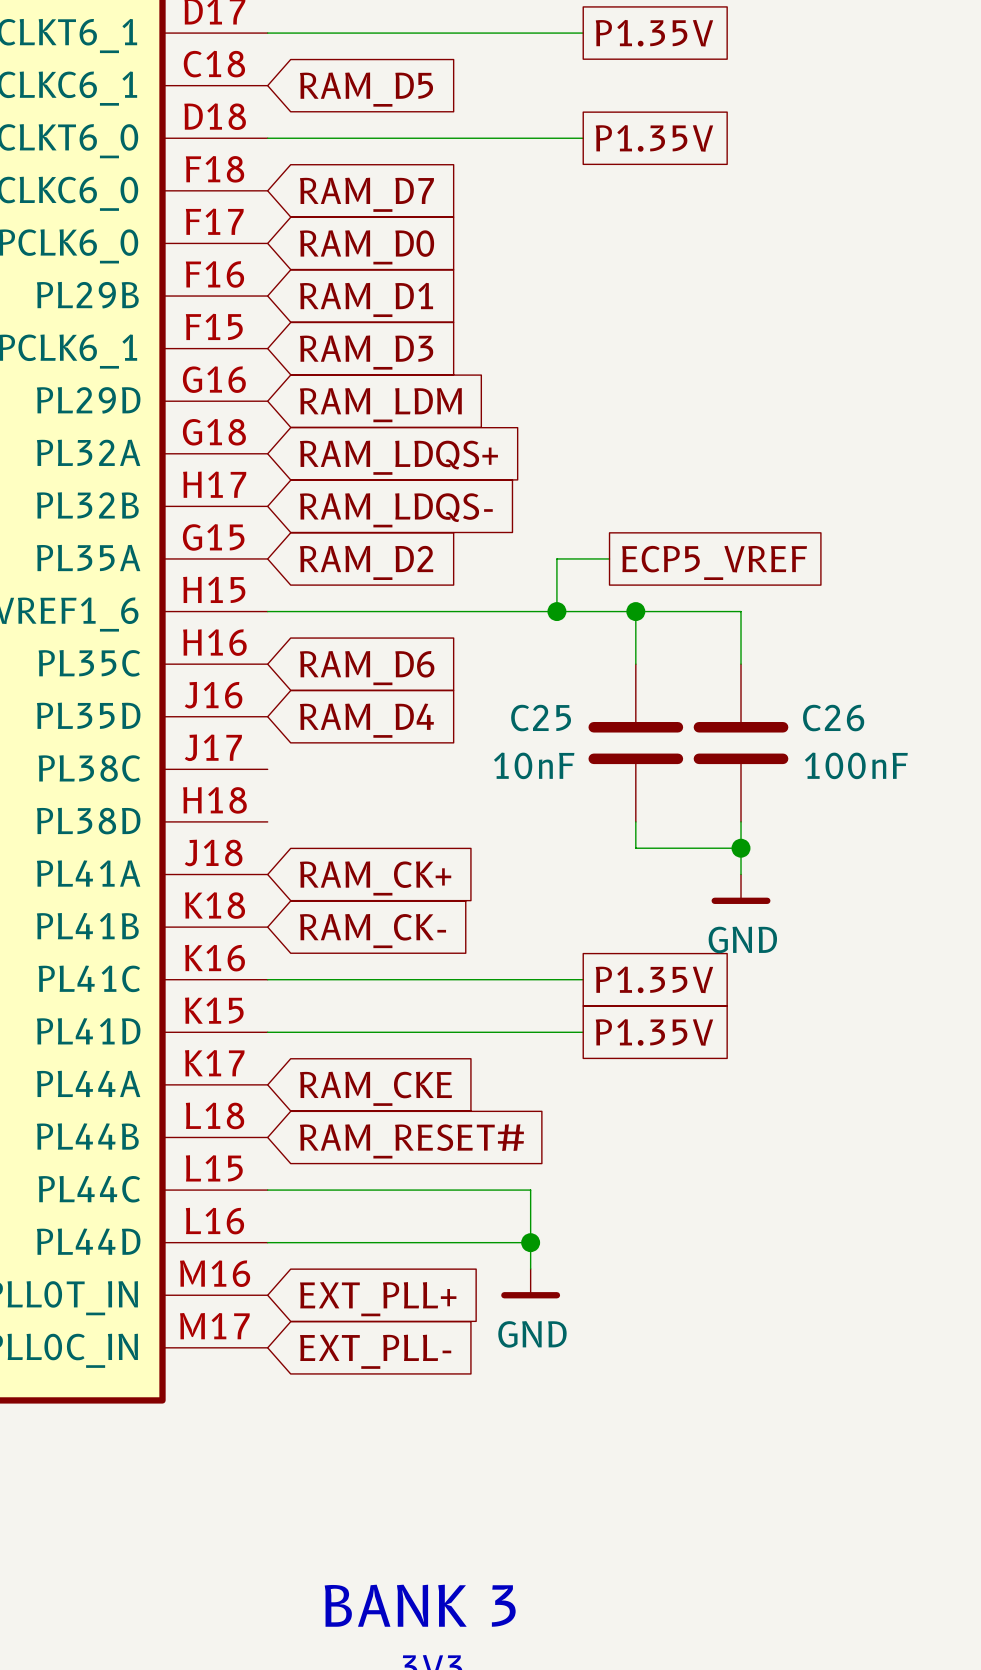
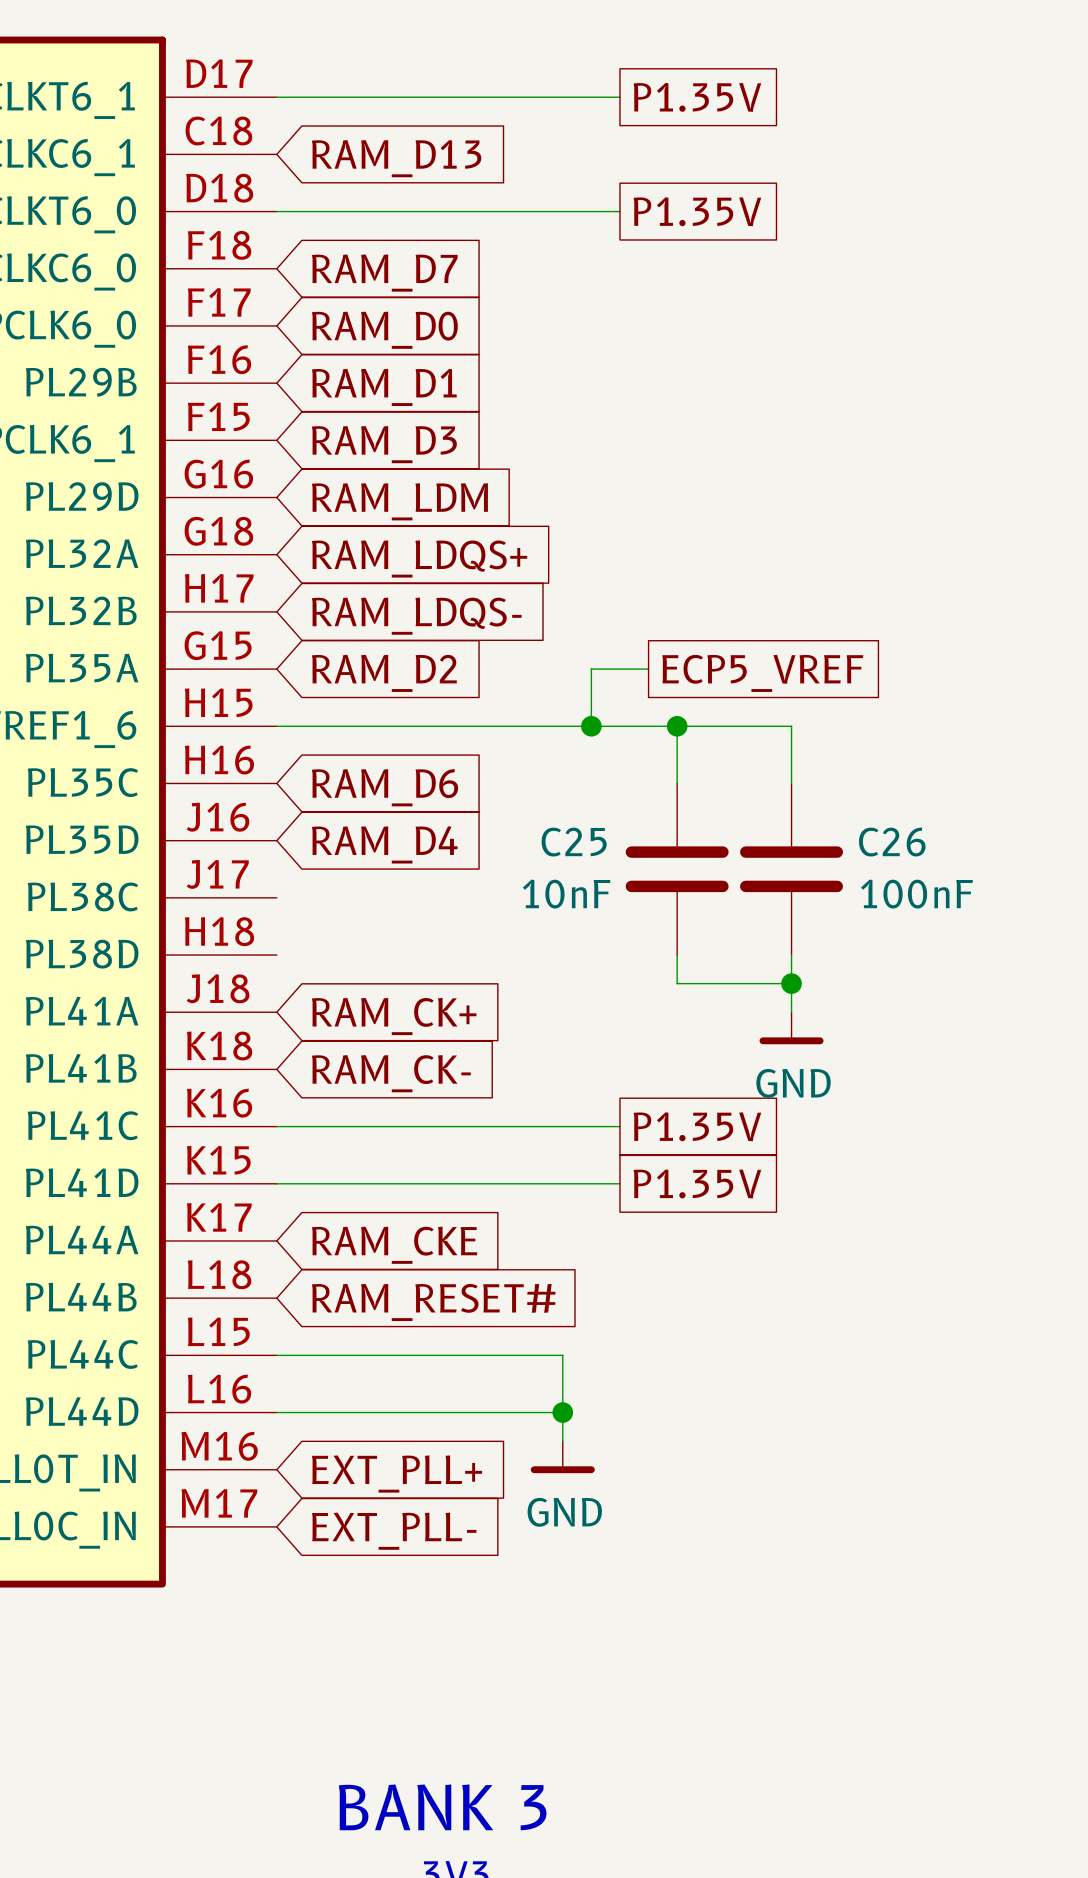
global label: RAM_D5 (366, 89) -> RAM_D13 (396, 158)

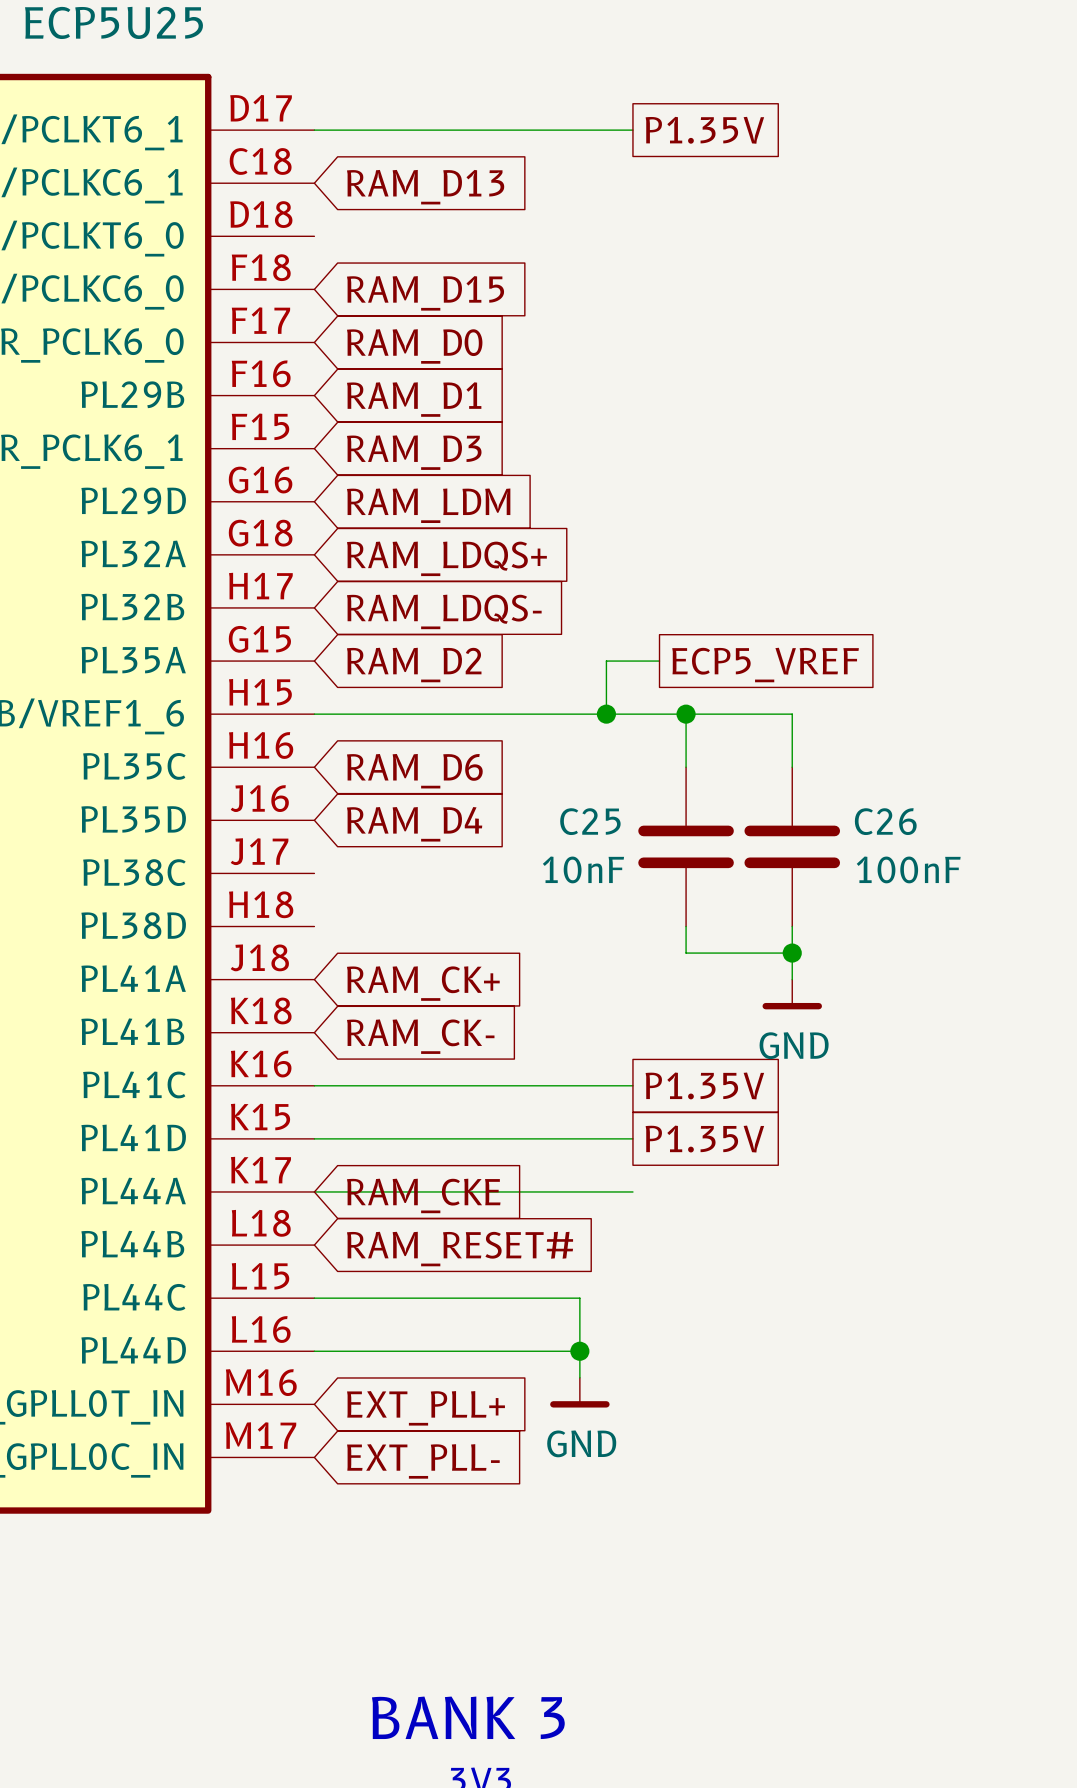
wire: (276, 211) (619, 211) -> none
global label: P1.35V (697, 211) -> none
global label: RAM_D7 (384, 273) -> RAM_D15 (425, 293)
wire: none -> (314, 1191) (632, 1191)

